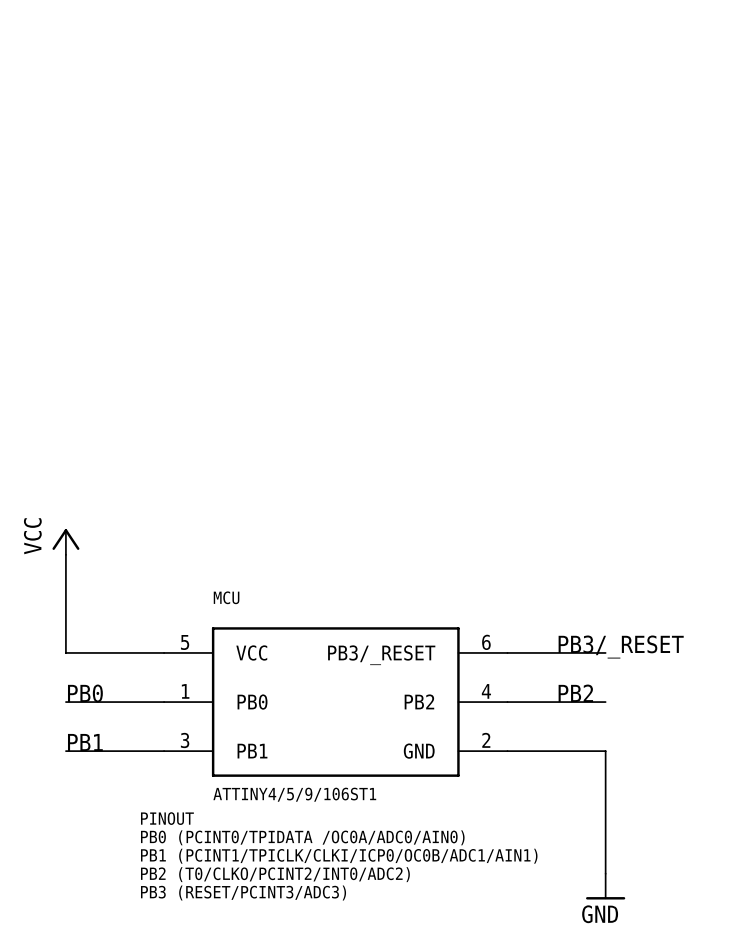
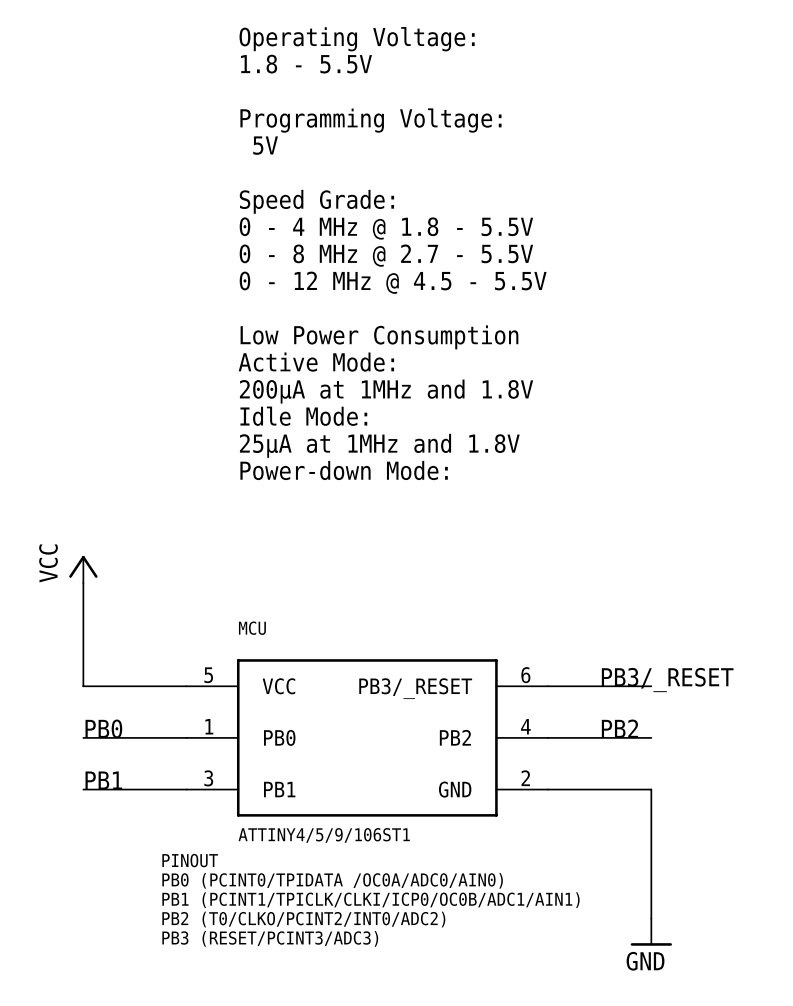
text: none -> Operating Voltage: (357, 39)
text: none -> 1.8 - 5.5V (306, 64)
text: none -> Programming Voltage: (370, 120)
text: none -> 5V (265, 145)
text: none -> Speed Grade: (316, 201)
text: none -> 0 - 4 MHz @ 1.8 - 5.5V (386, 228)
text: none -> 0 - 8 MHz @ 2.7 - 5.5V (386, 255)
text: none -> 0 - 12 MHz @ 4.5 - 5.5V (393, 282)
text: none -> Low Power Consumption (379, 337)
text: none -> Active Mode: (316, 362)
text: none -> 200μA at 1MHz and 1.8V (386, 391)
text: none -> Idle Mode: (303, 416)
text: none -> 25μA at 1MHz and 1.8V (379, 445)
text: none -> Power-down Mode: (344, 470)

